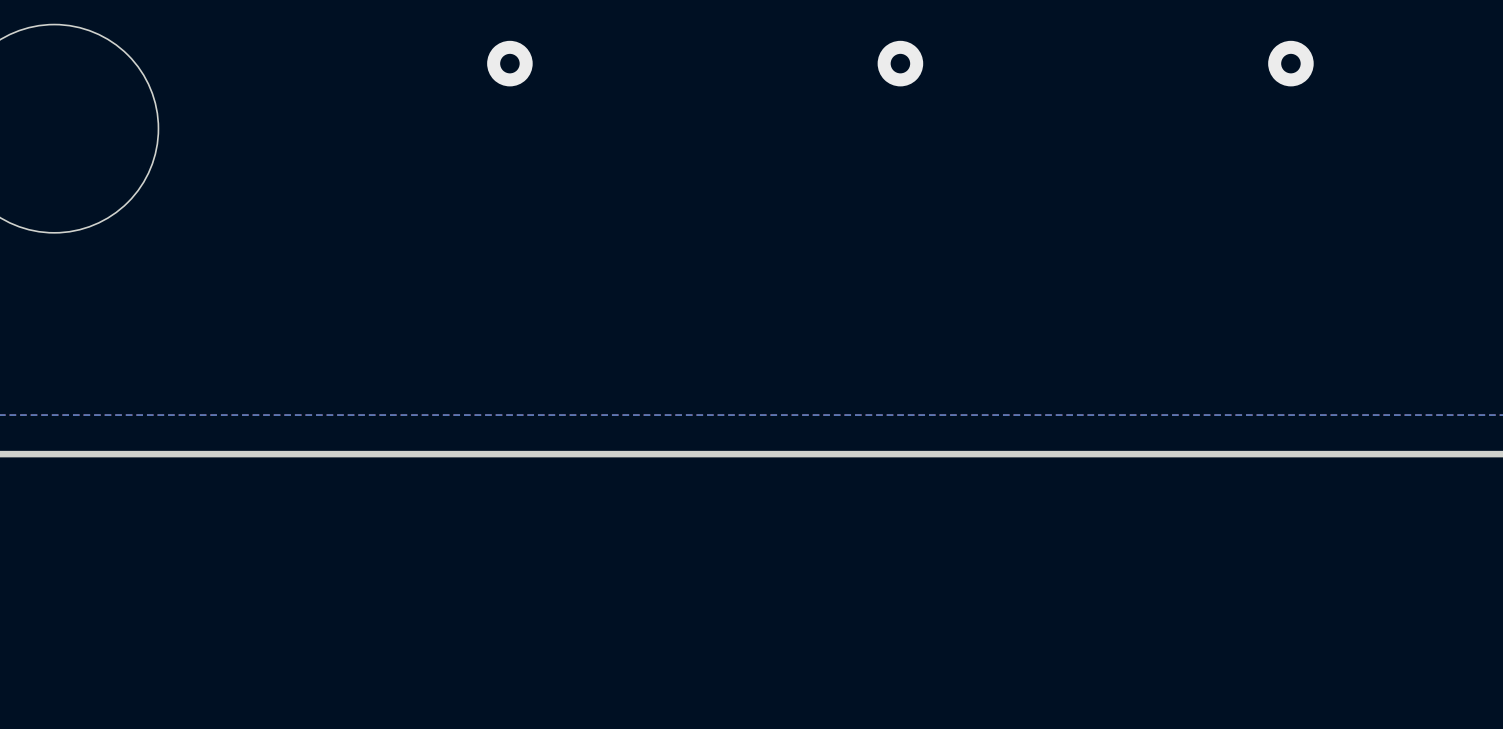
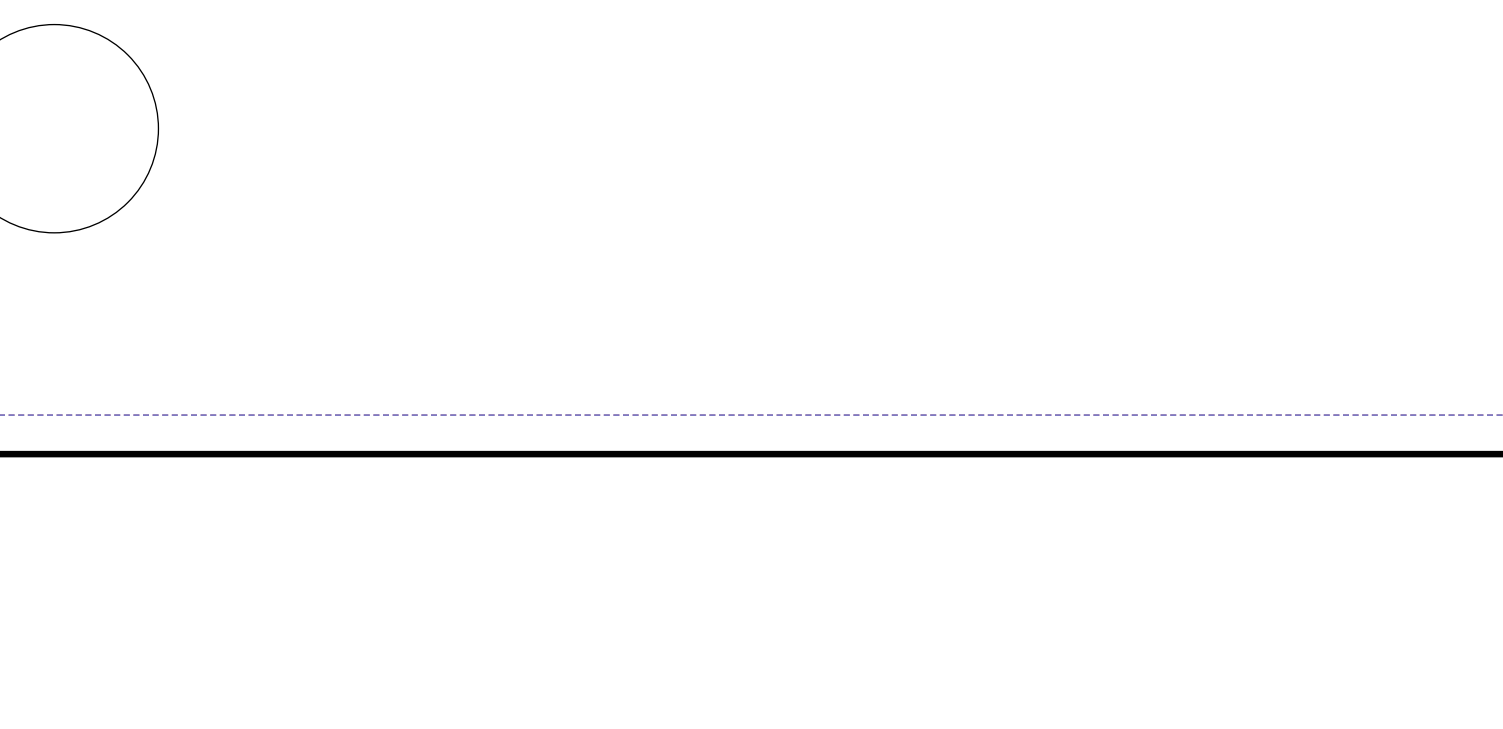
via: (509, 63) -> none
via: (900, 63) -> none
via: (1290, 63) -> none

